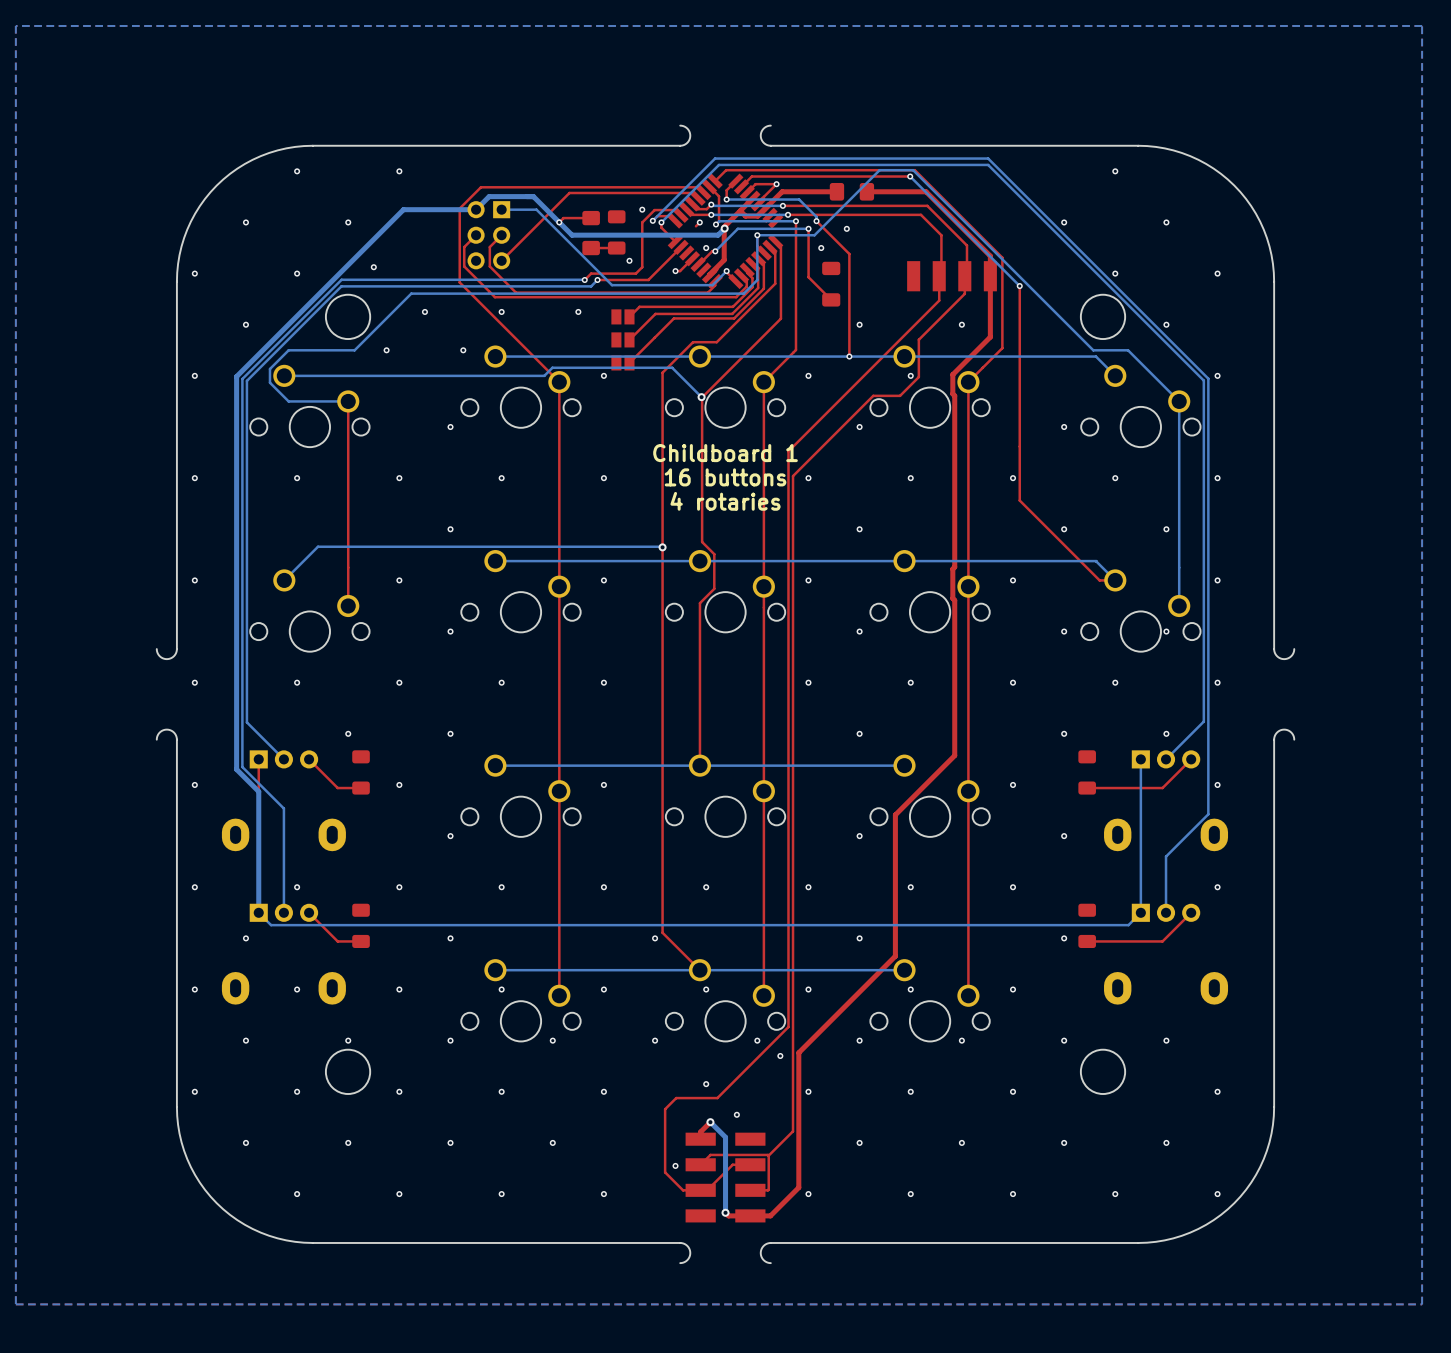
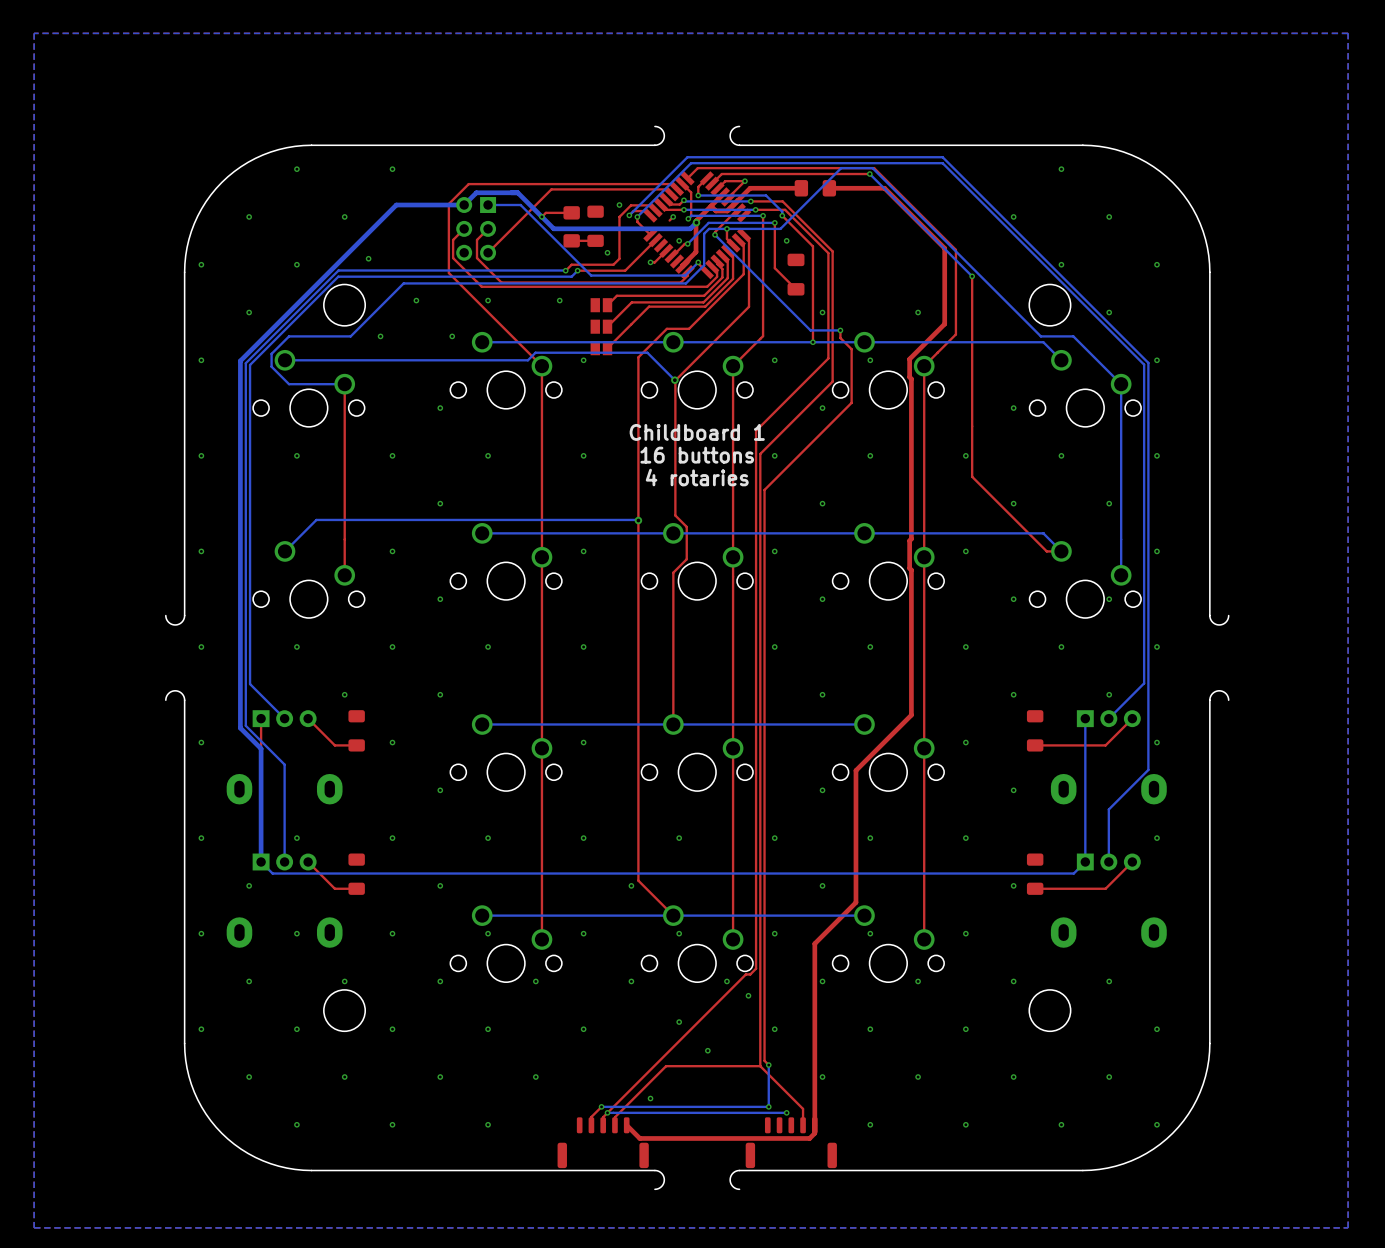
top track: (816, 205) (927, 205) (966, 245) (966, 276) -> (782, 201) (832, 251) (832, 381)
top track: (819, 214) (920, 214) (941, 235) (941, 276) -> (785, 209) (828, 253) (828, 358)
top track: none -> (738, 210) (715, 232) (715, 234)
via: (846, 228) -> none
bottom track: (757, 235) (757, 280) (743, 293) (713, 293) -> (726, 228) (709, 228) (704, 233) (704, 265) (685, 283)
bottom track: none -> (715, 234) (810, 330) (840, 330)
via: none -> (715, 234)
top track: (939, 276) (939, 300) (865, 373) -> none
part: (952, 276) -> none
top track: (964, 276) (964, 293) (918, 339) (918, 377) (900, 395) (873, 395) (870, 398) -> none
top track: none -> (840, 330) (840, 338) (851, 349) (851, 402) (764, 489) (764, 1060) (768, 1065)
via: none -> (840, 330)
top track: (851, 1000) (798, 1052) (798, 1187) (770, 1215) (728, 1215) (725, 1212) -> (814, 943) (814, 1133) (809, 1138) (639, 1138) (626, 1125)
top track: (782, 1033) (717, 1098) (676, 1098) (665, 1109) (665, 1172) (683, 1190) (707, 1190) (732, 1164) (750, 1164) -> (750, 974) (745, 974) (603, 1117) (603, 1125)
top track: (710, 1122) (700, 1131) (700, 1139) -> none
bottom track: (710, 1122) (725, 1137) (725, 1212) -> none
via: (710, 1122) -> none
bottom track: none -> (768, 1065) (768, 1106) (601, 1106)
via: none -> (768, 1065)
top track: (793, 1131) (768, 1155) -> none
top track: (768, 1155) (710, 1154) (700, 1164) -> none
top track: (768, 1155) (768, 1189) (750, 1190) -> none
top track: none -> (601, 1106) (591, 1116) (591, 1125)
via: none -> (601, 1106)
via: none -> (768, 1106)
part: (700, 1177) -> none
part: (750, 1177) -> none
via: none -> (607, 1112)
bottom track: none -> (786, 1112) (607, 1112)
via: none -> (786, 1112)
via: (603, 1194) -> none
via: (808, 1194) -> none
top track: none -> (803, 1125) (803, 1108) (760, 1066) (666, 1066) (614, 1117) (614, 1125)
via: (725, 1212) -> none
part: none -> (603, 1142)
part: none -> (791, 1142)

